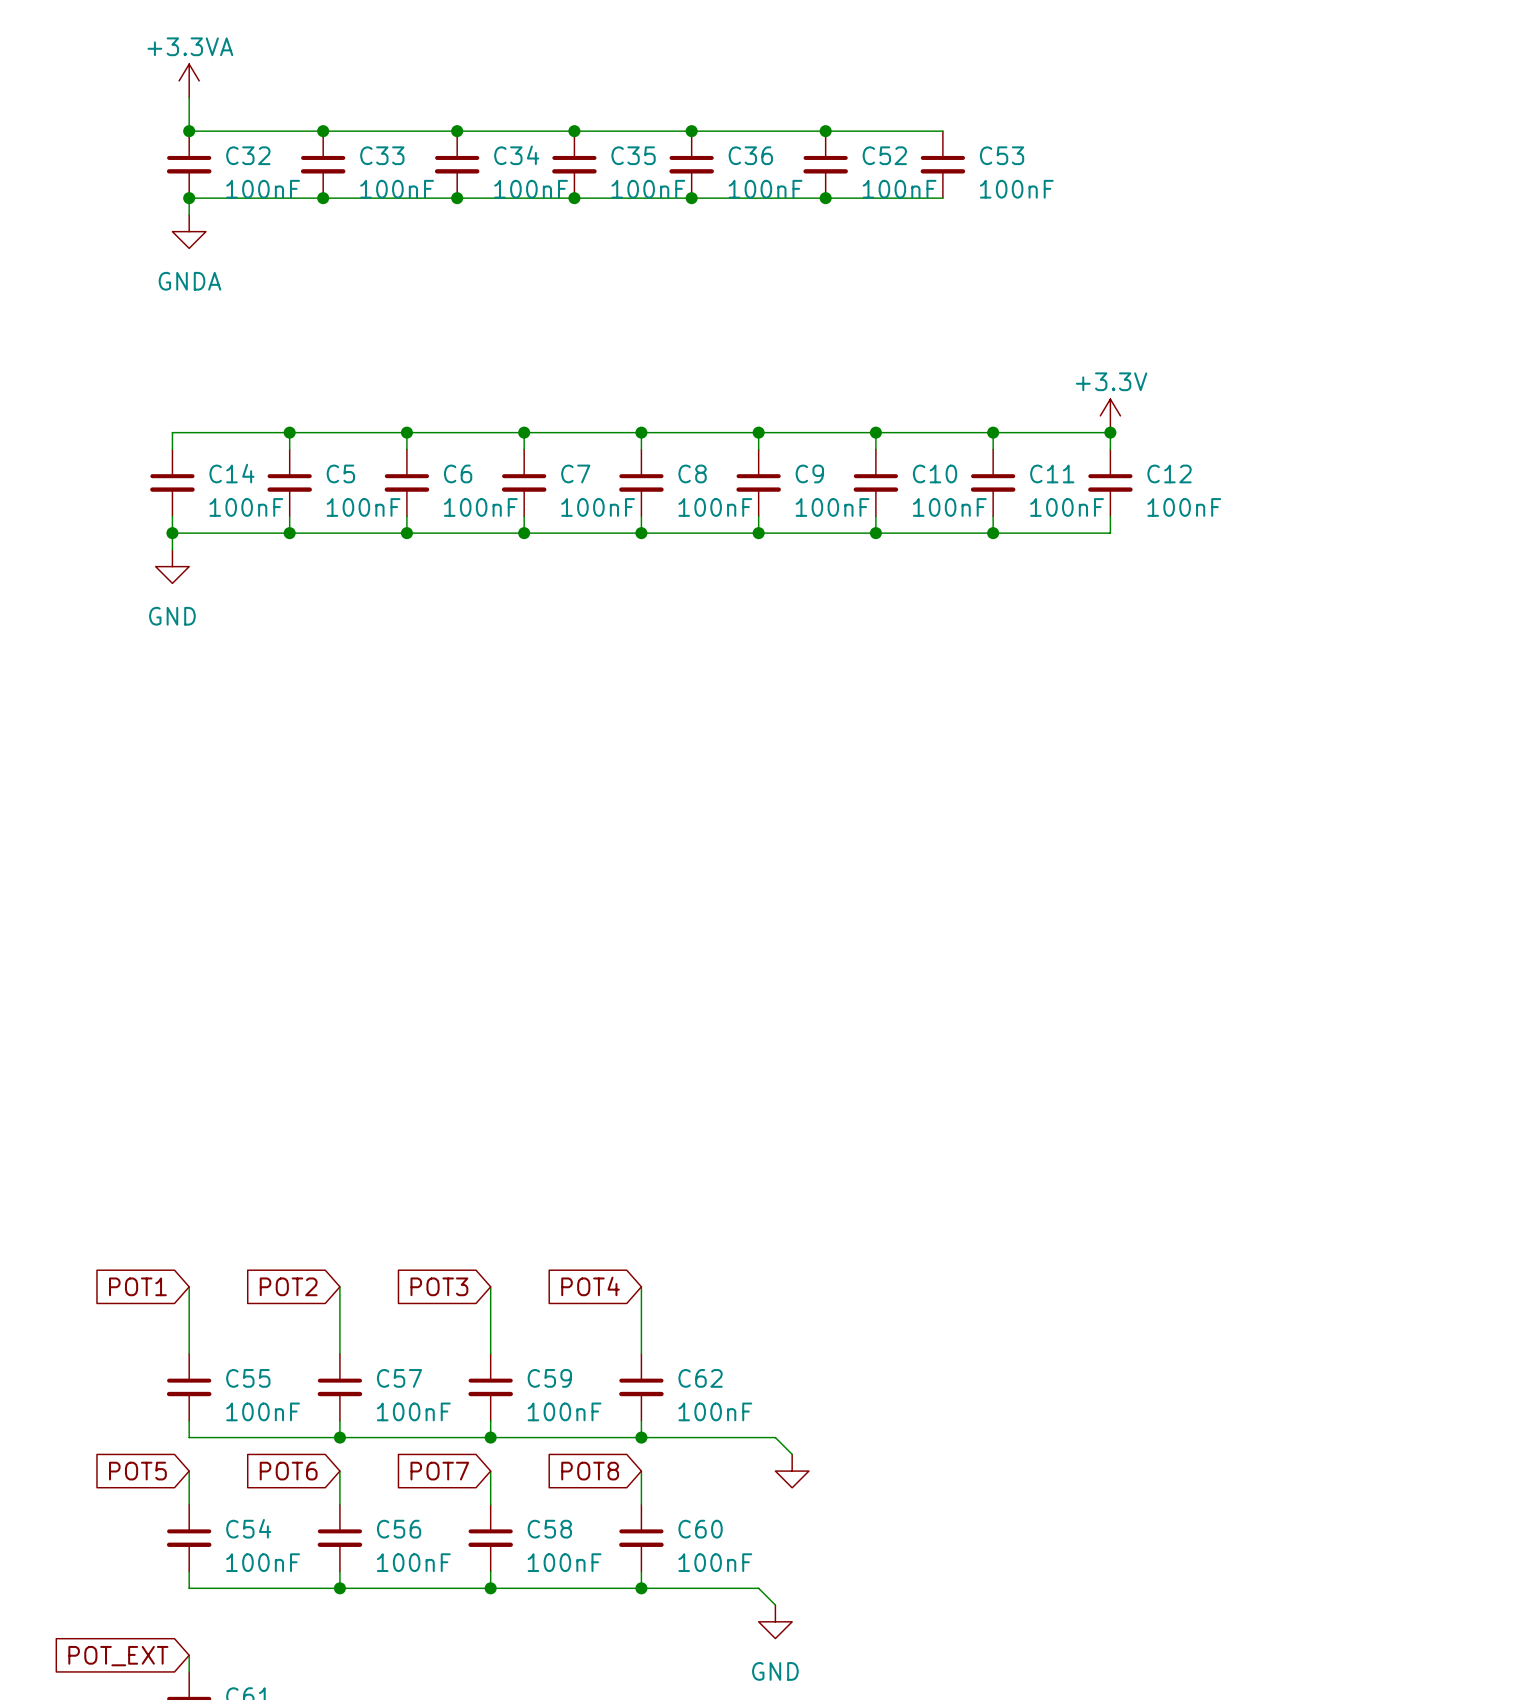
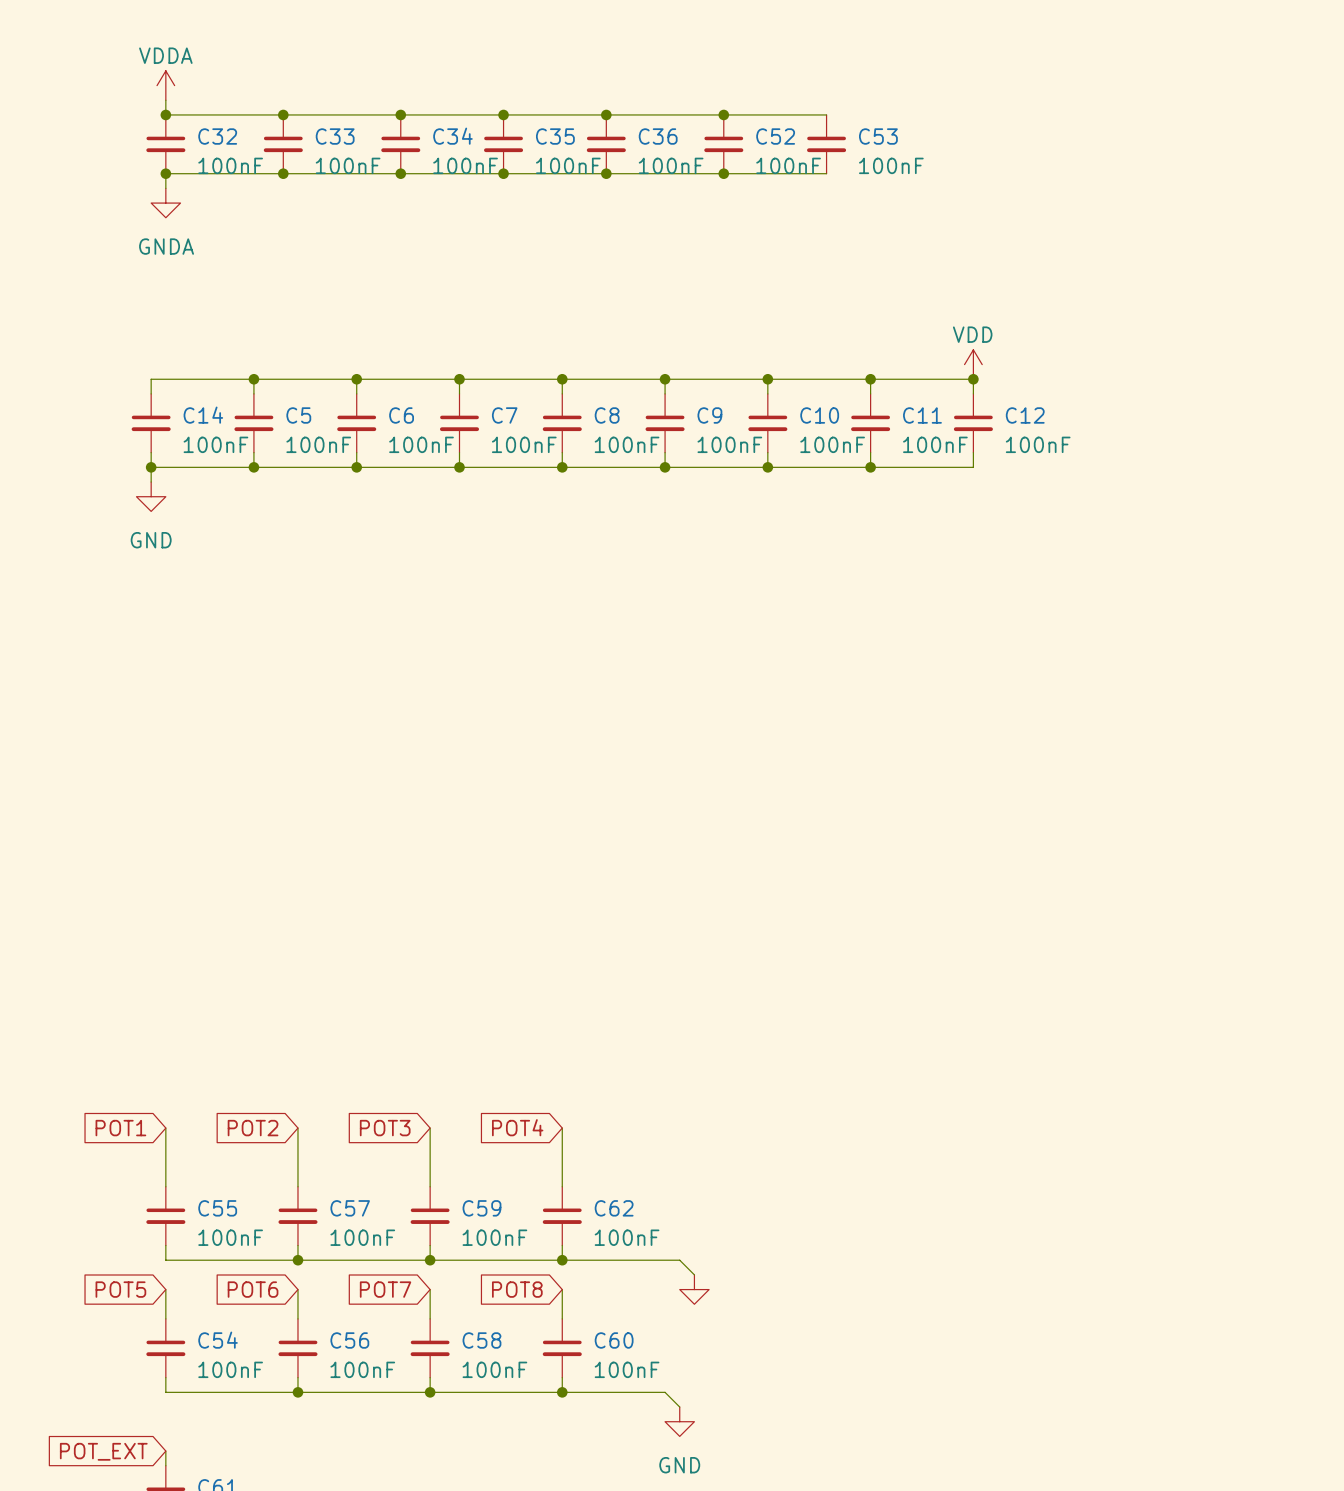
power symbol: +3.3VA (189, 80) -> none
power symbol: none -> VDDA (165, 85)
power symbol: +3.3V (1110, 415) -> VDD (973, 364)

